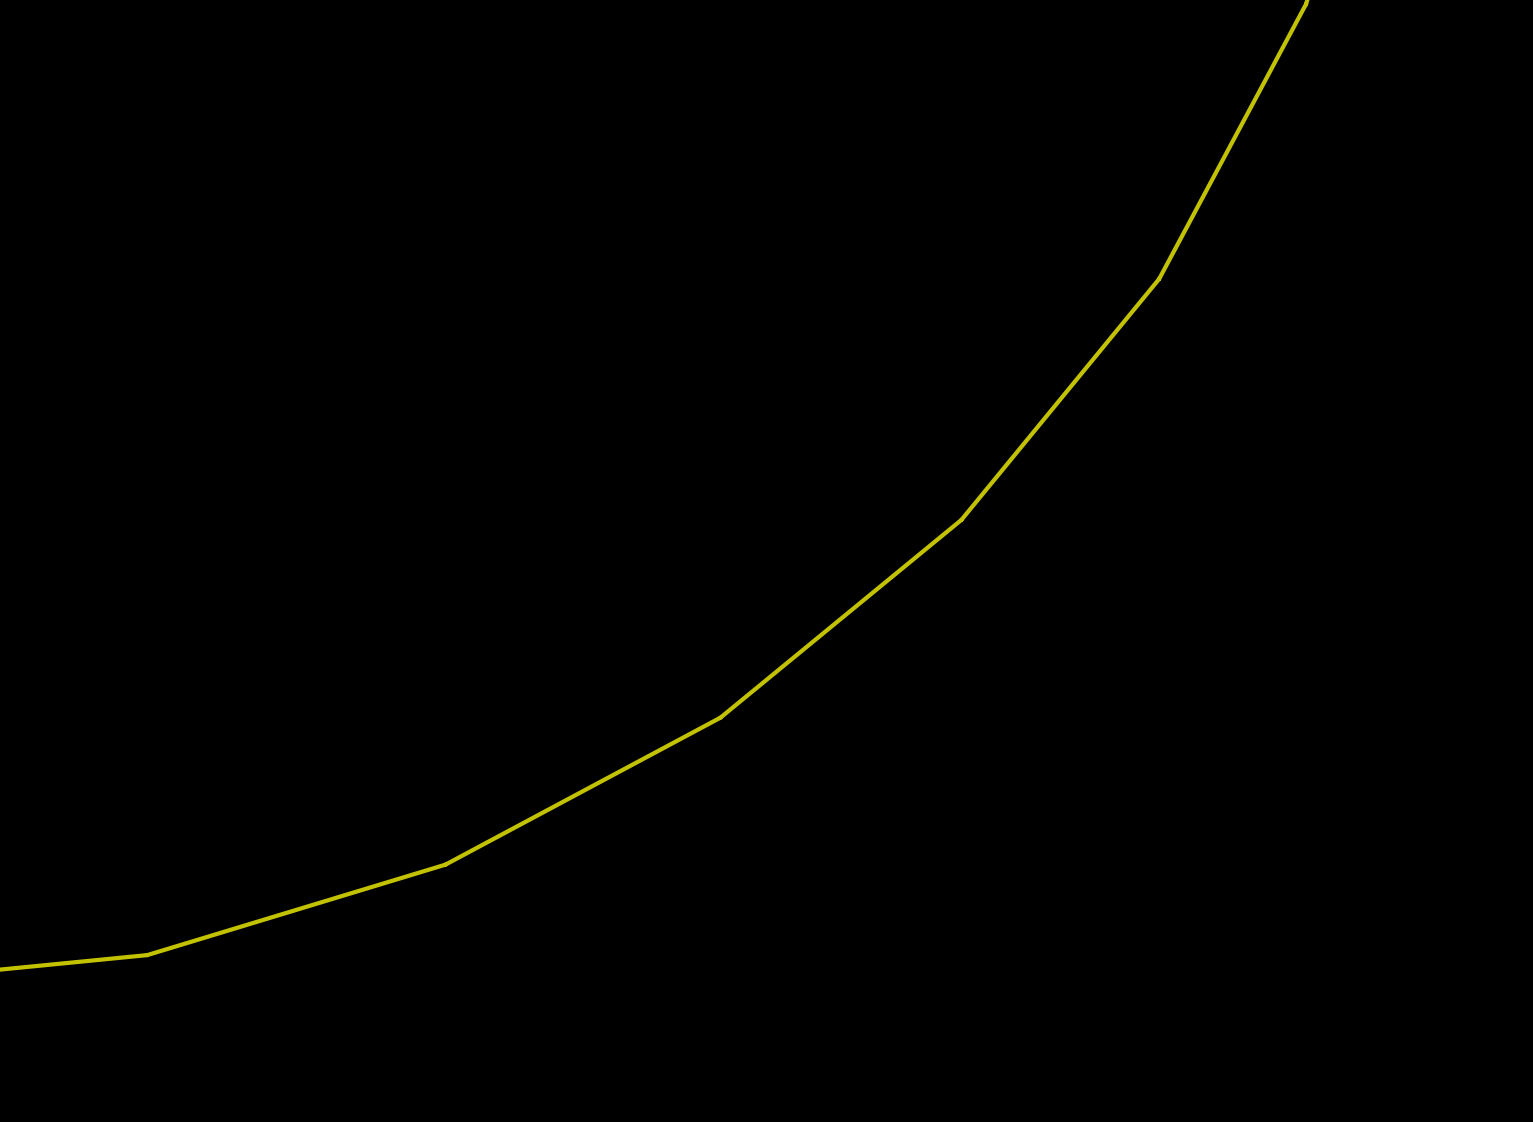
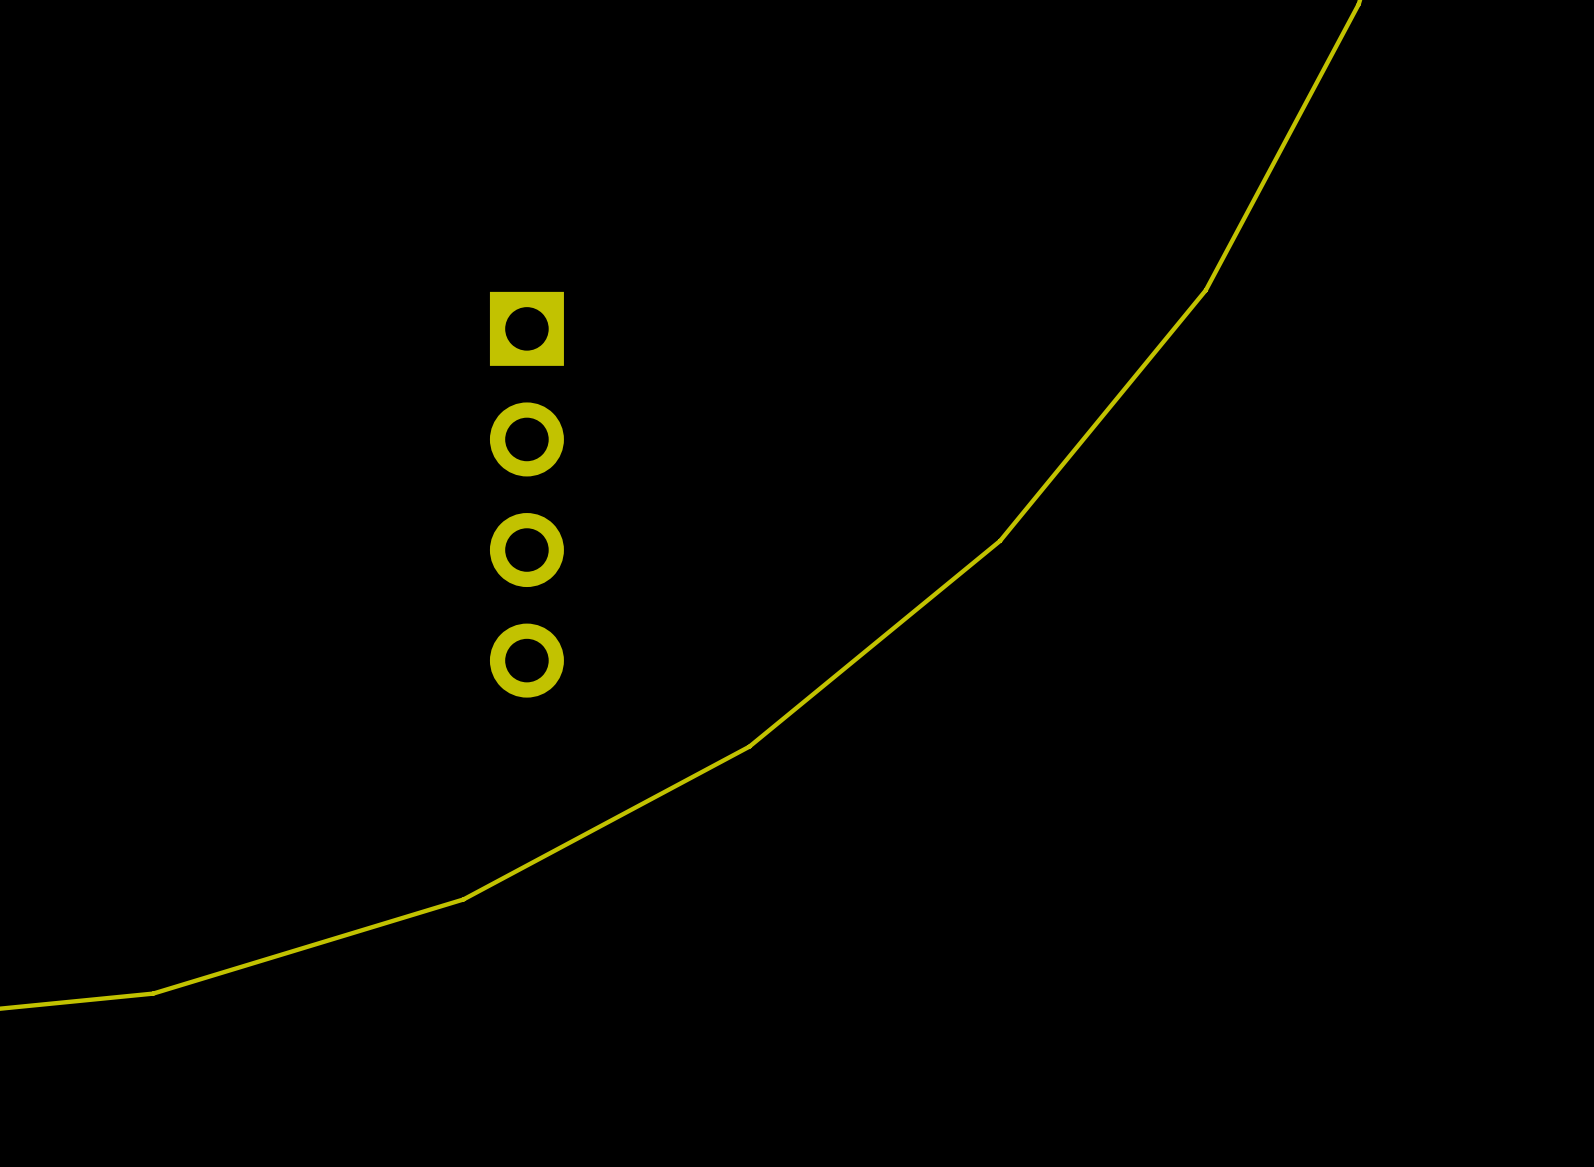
part: none -> (526, 494)

